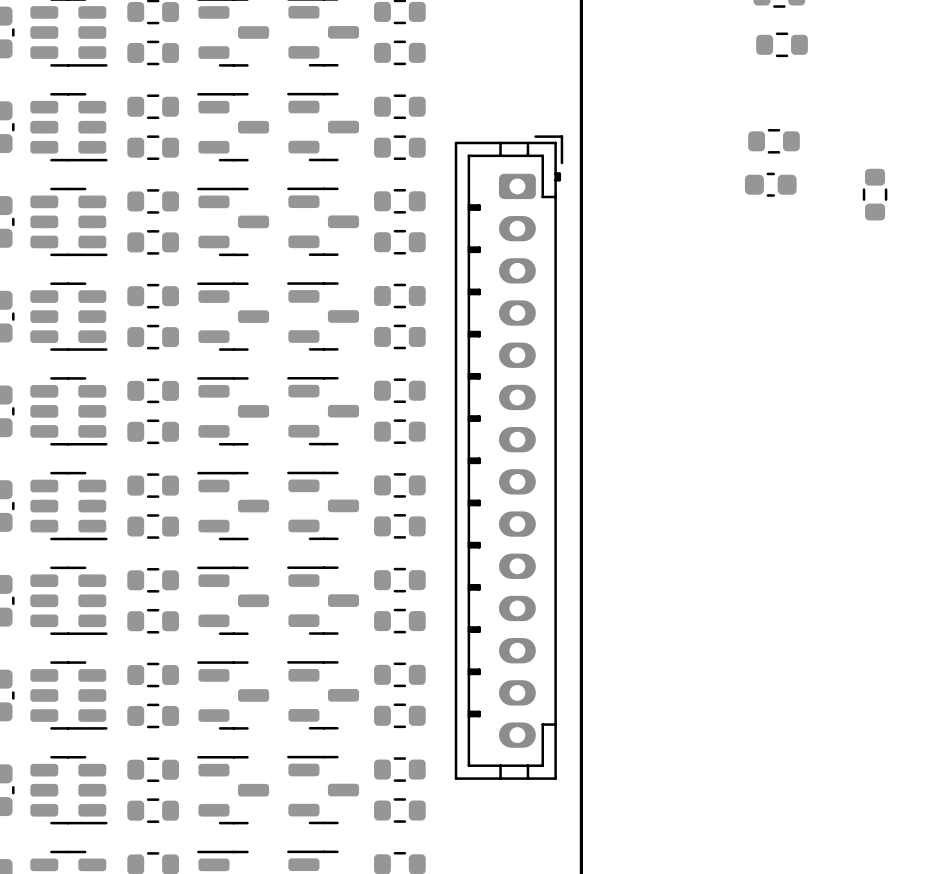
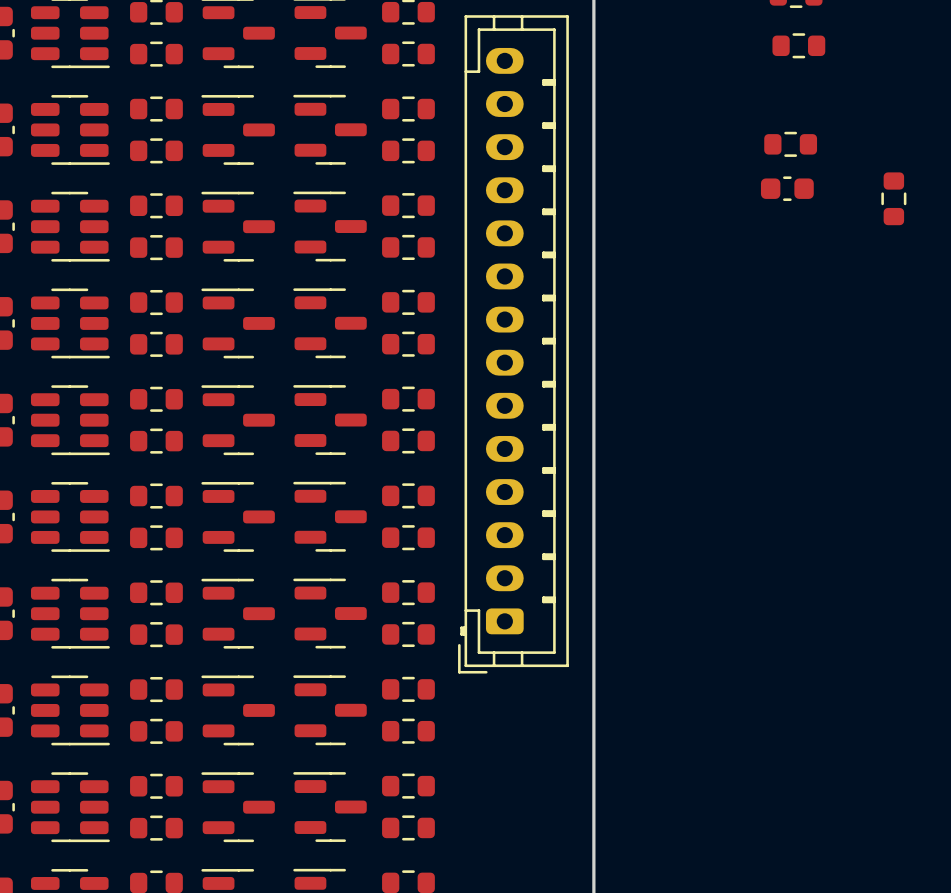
part rotation: 0° (508, 457) -> 180° (513, 344)

